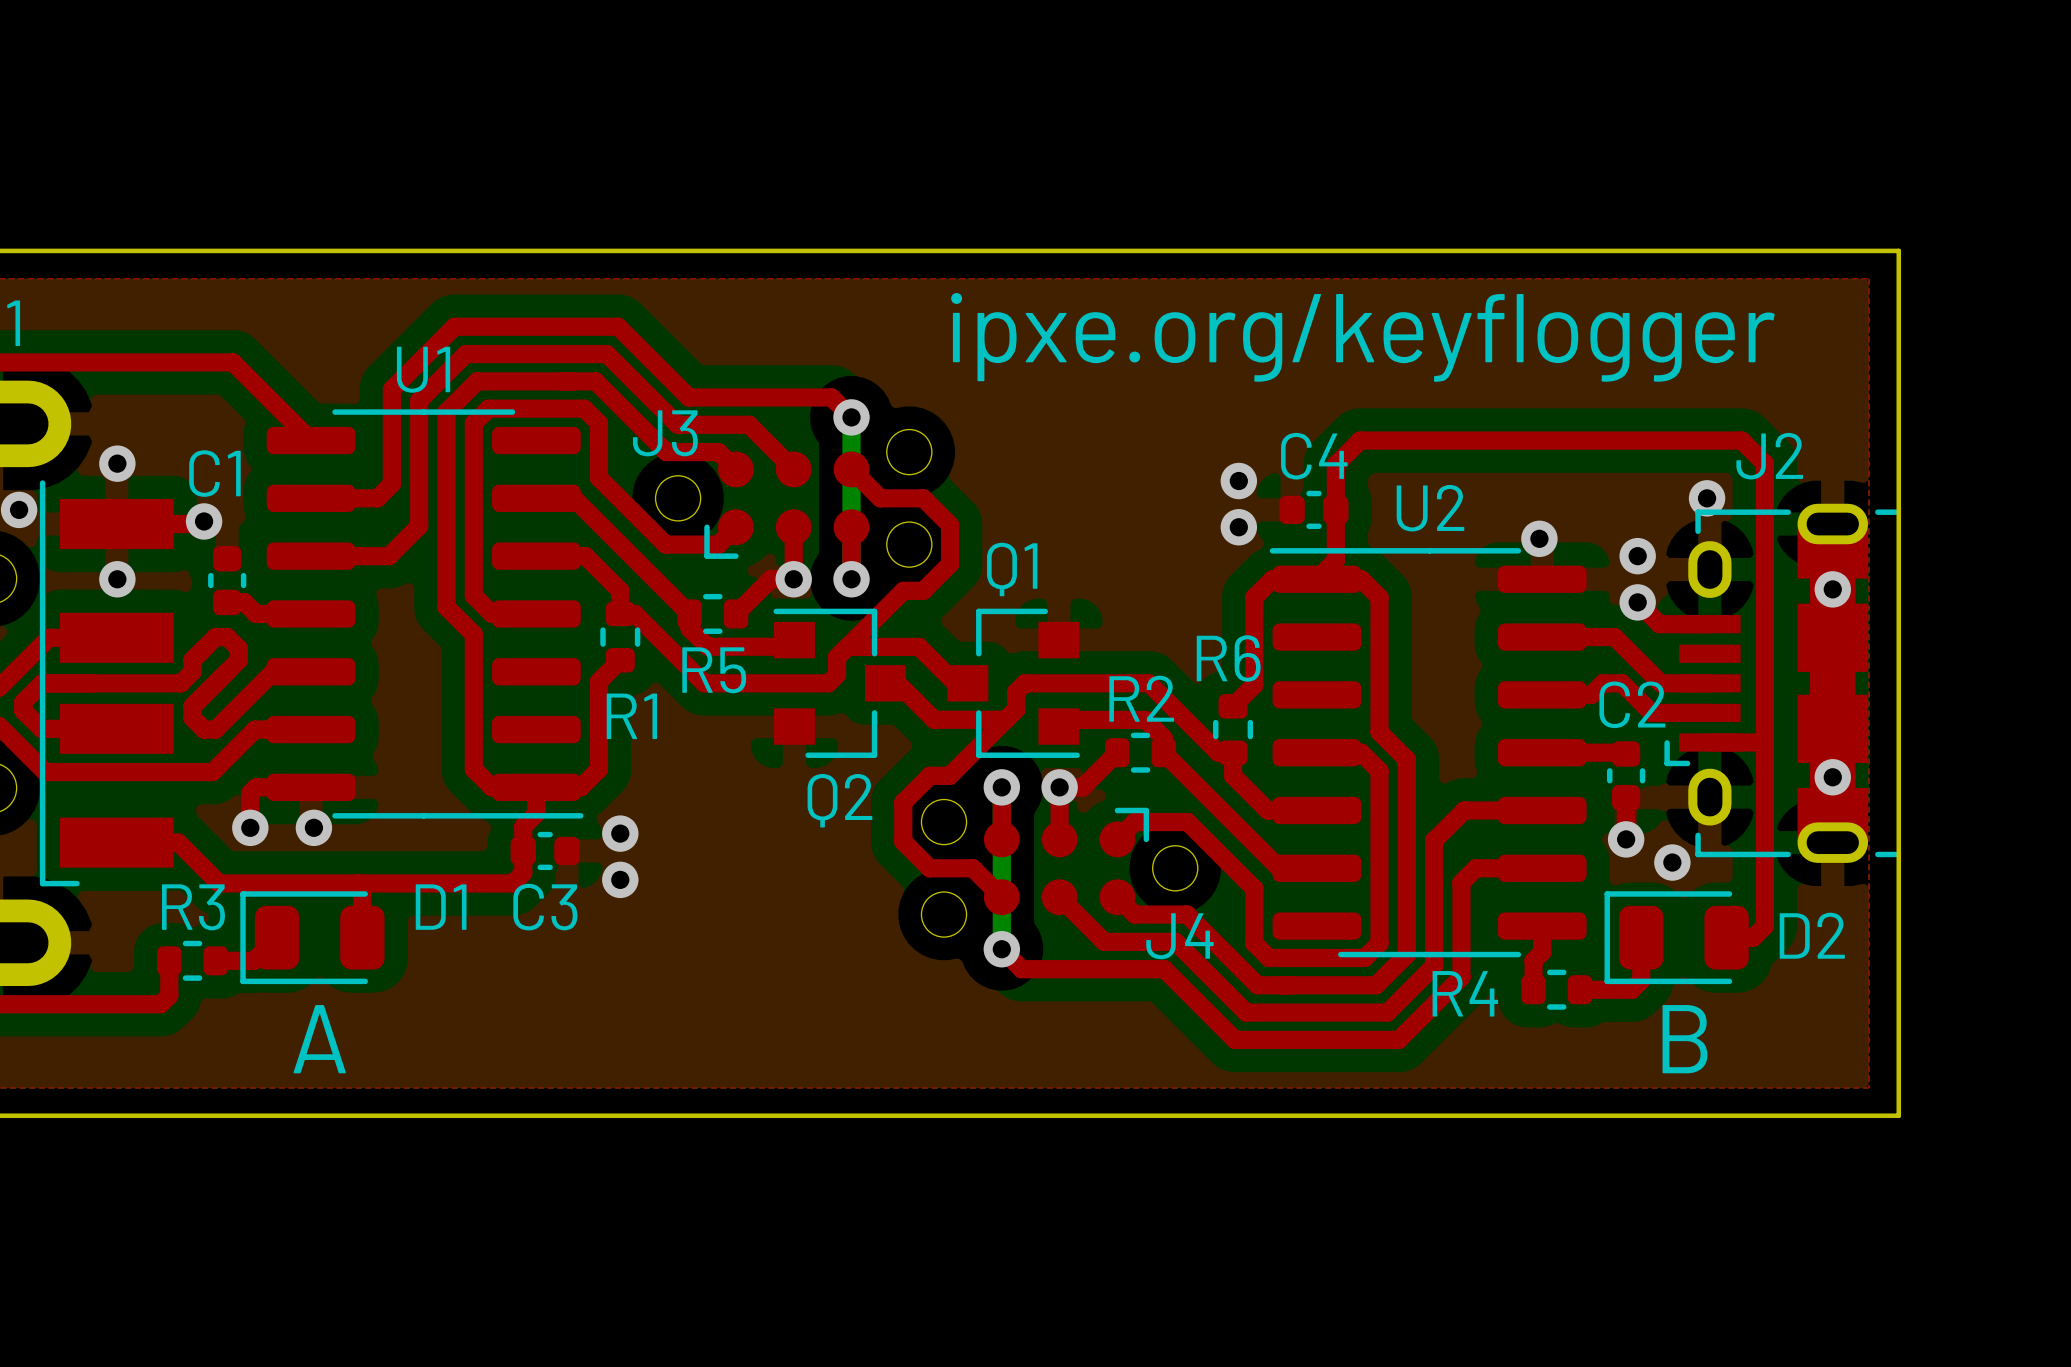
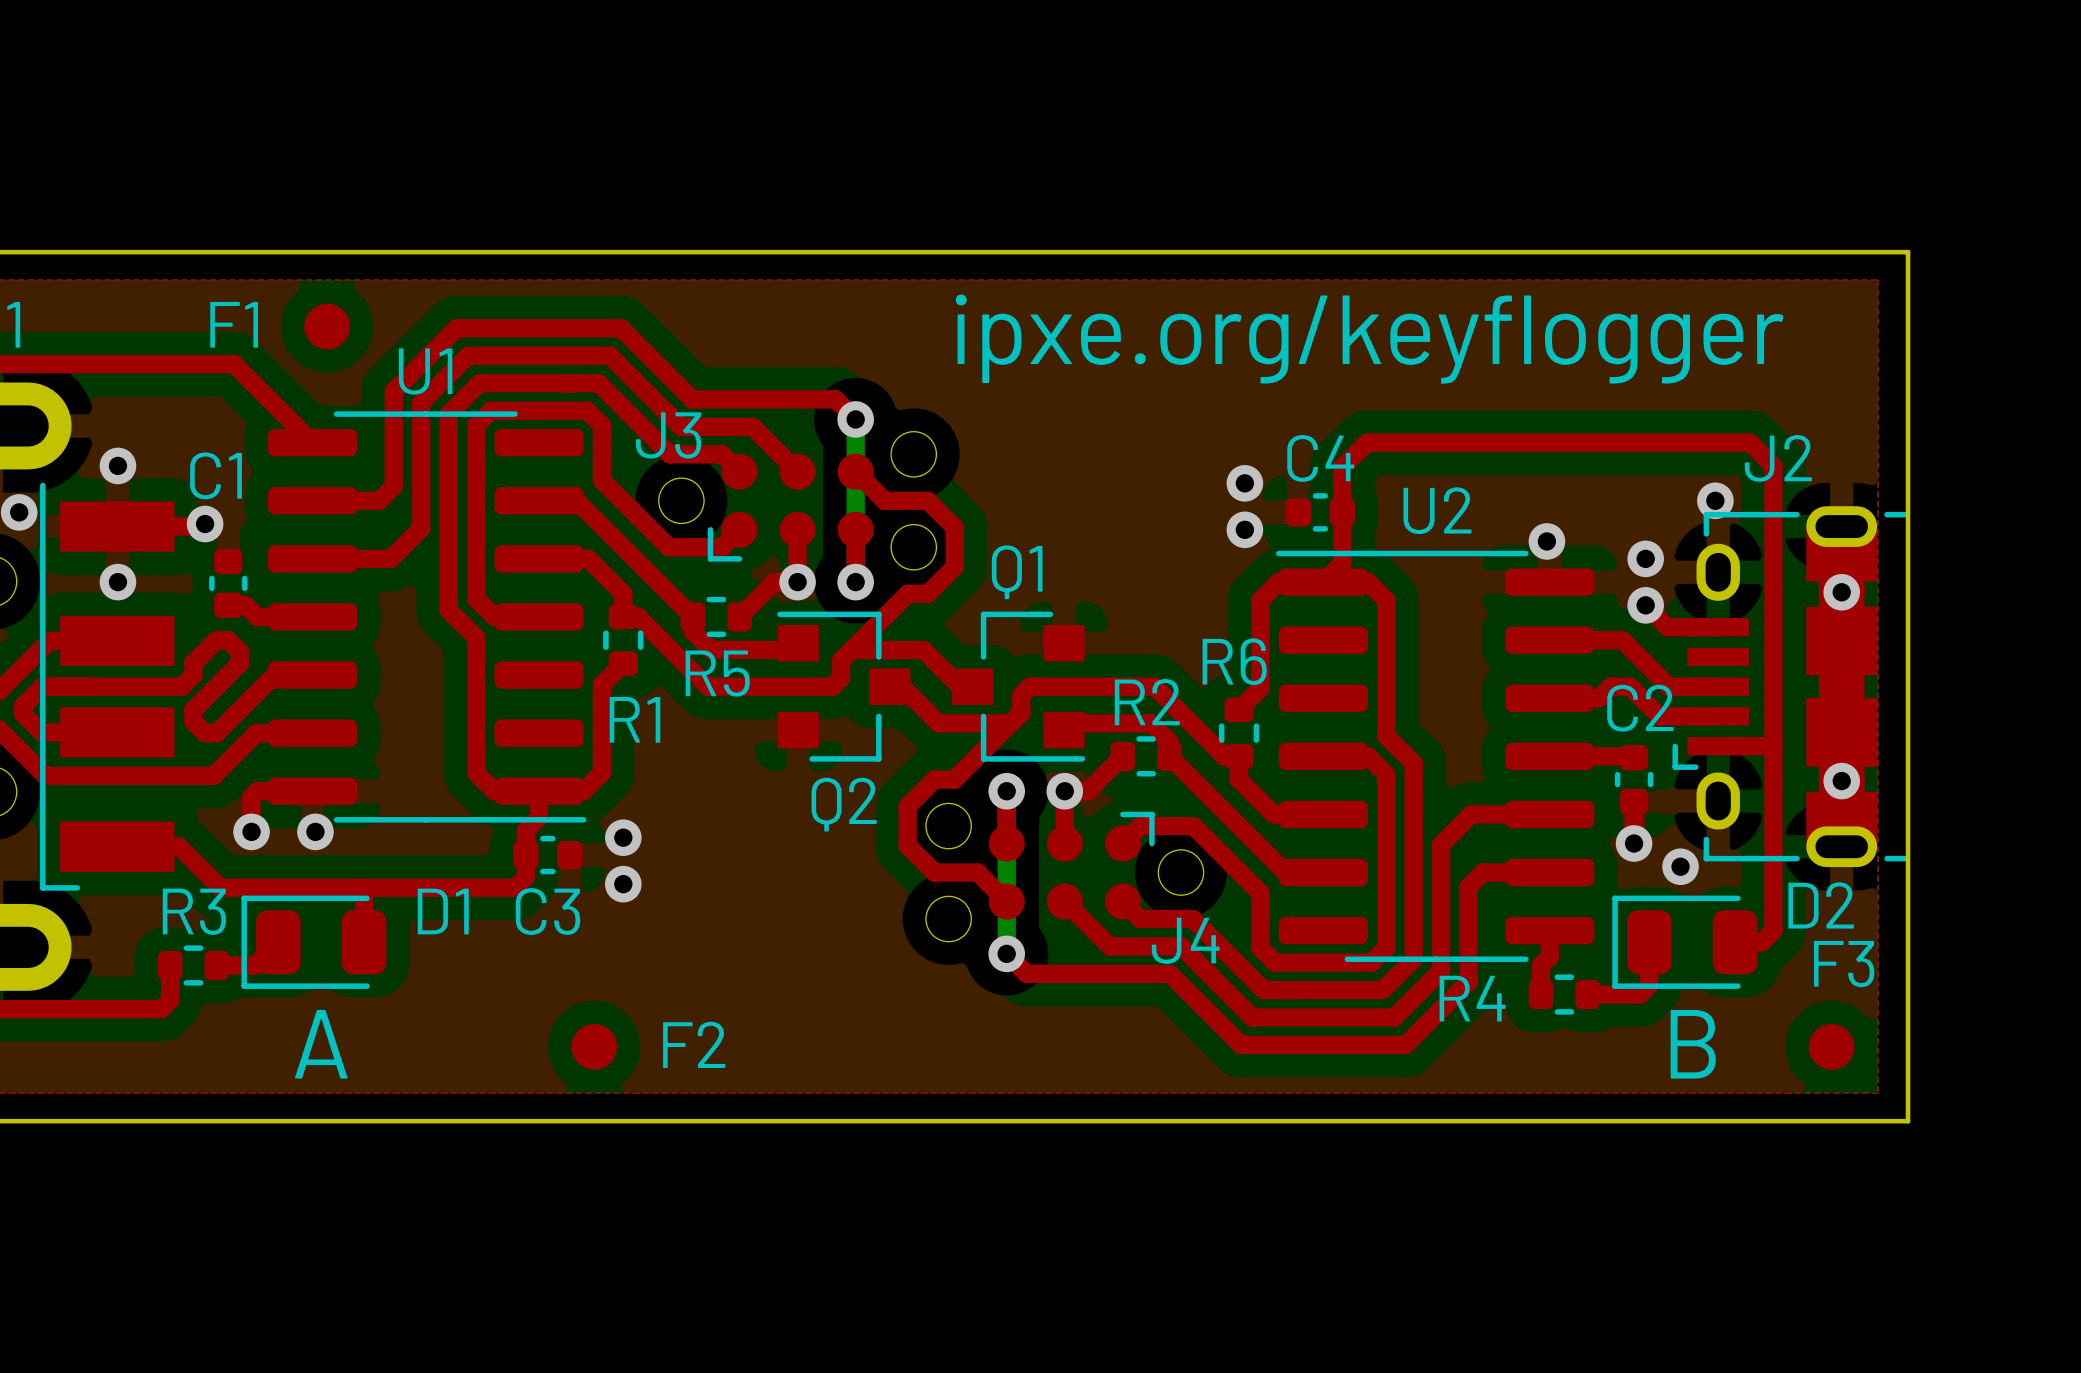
F1: none -> (327, 326)
D2 name position: D2 (1812, 935) -> D2 (1821, 905)
F2: none -> (594, 1046)
F3: none -> (1831, 1046)

